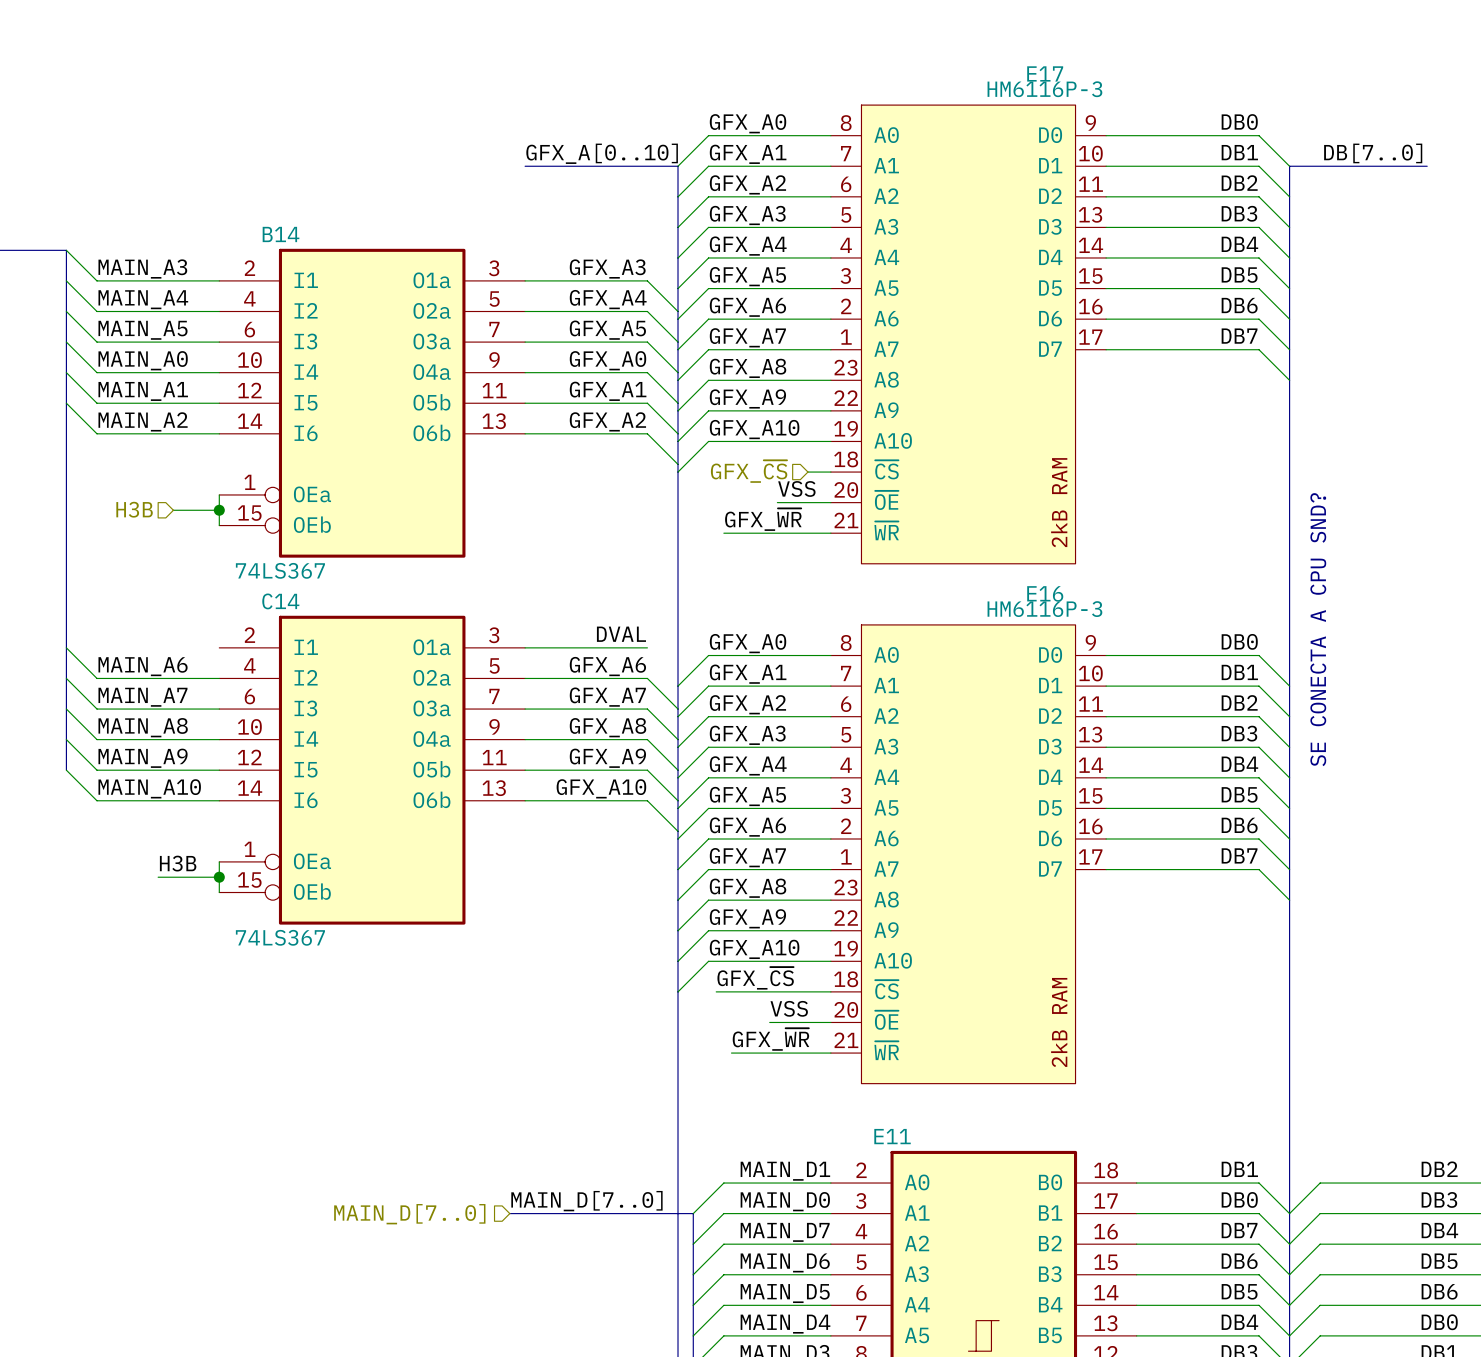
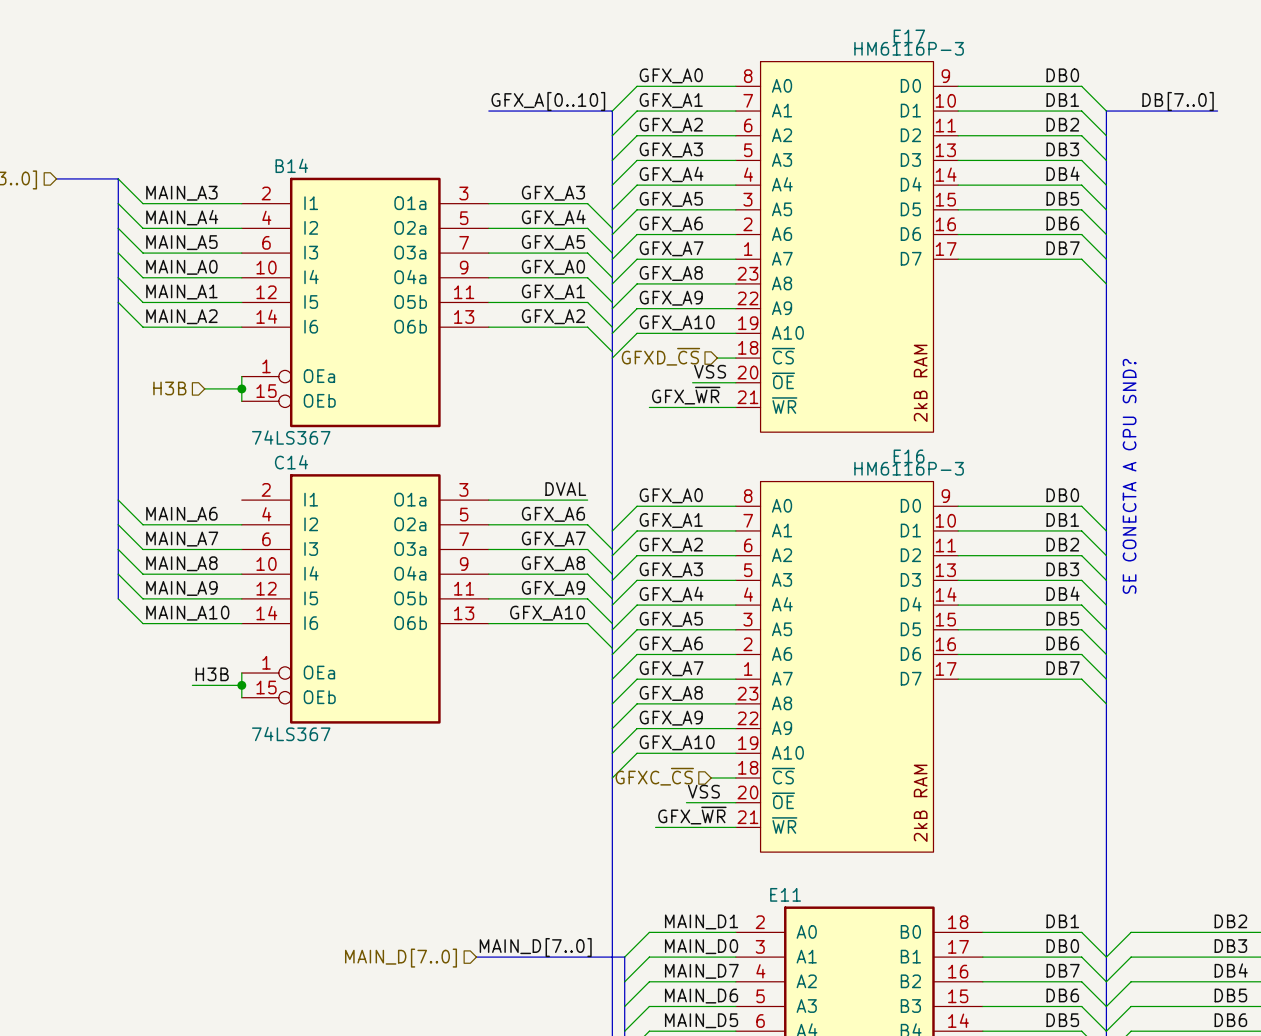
hierarchical label: GFX_~{CS} (749, 471) -> GFXD_~{CS} (660, 356)
label: GFX_~{CS} (755, 978) -> none
wire: (716, 991) (800, 991) -> none
hierarchical label: none -> GFXC_~{CS} (654, 776)

